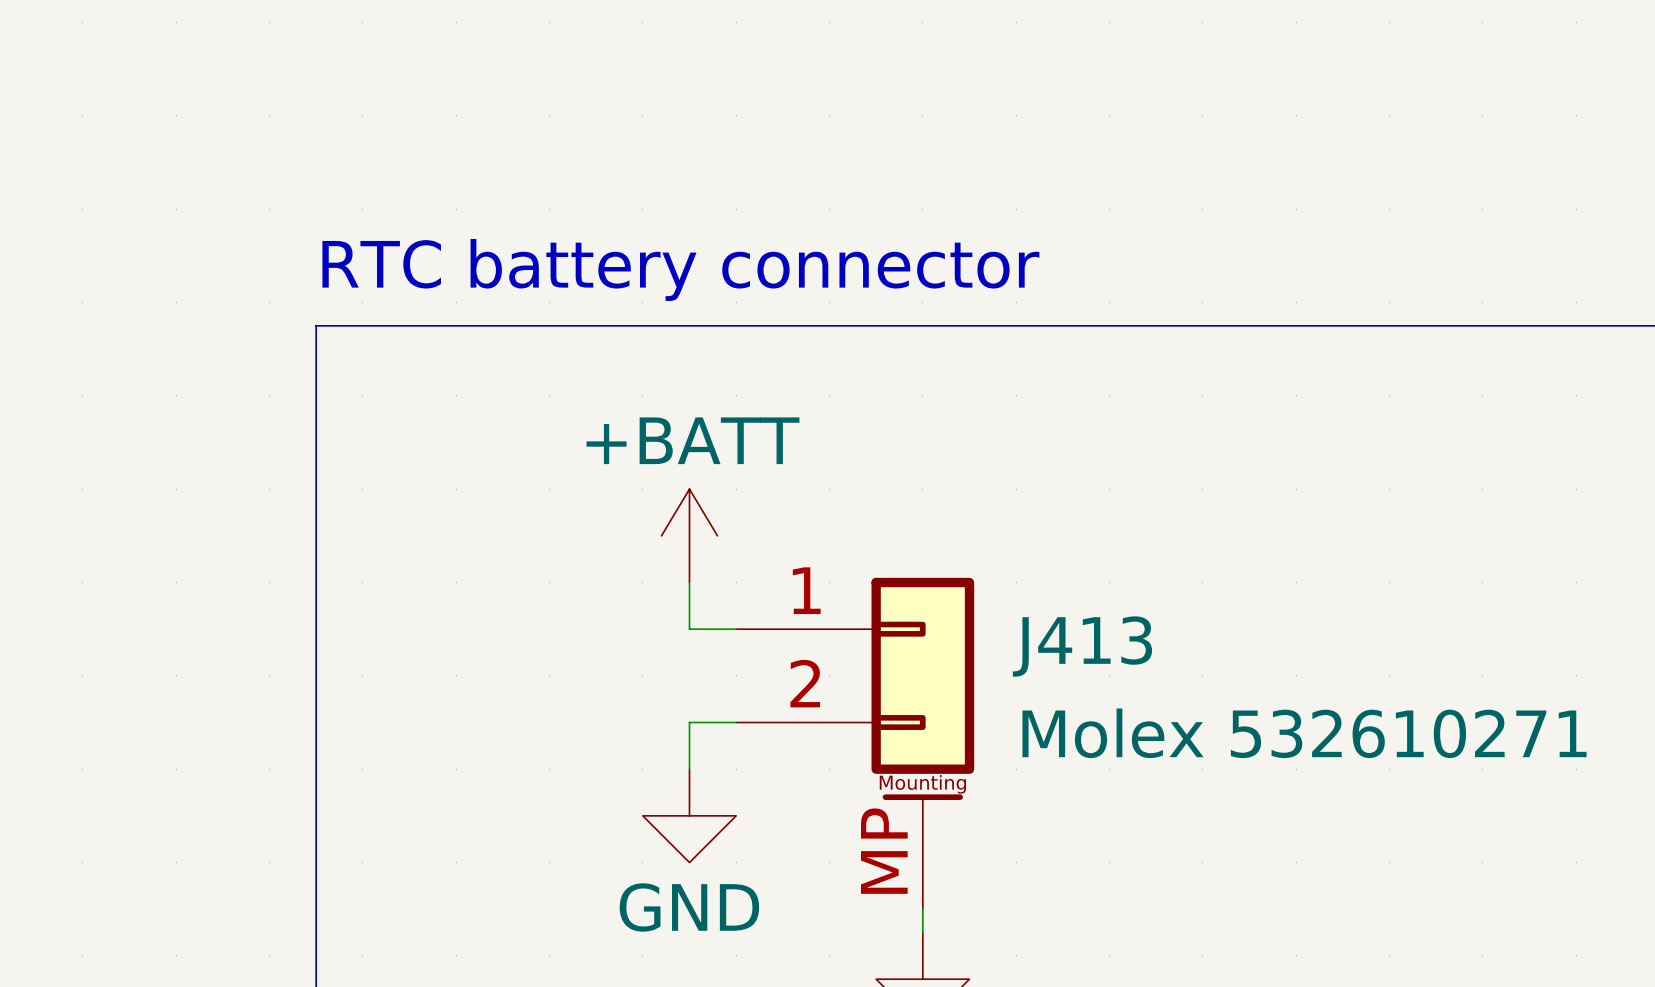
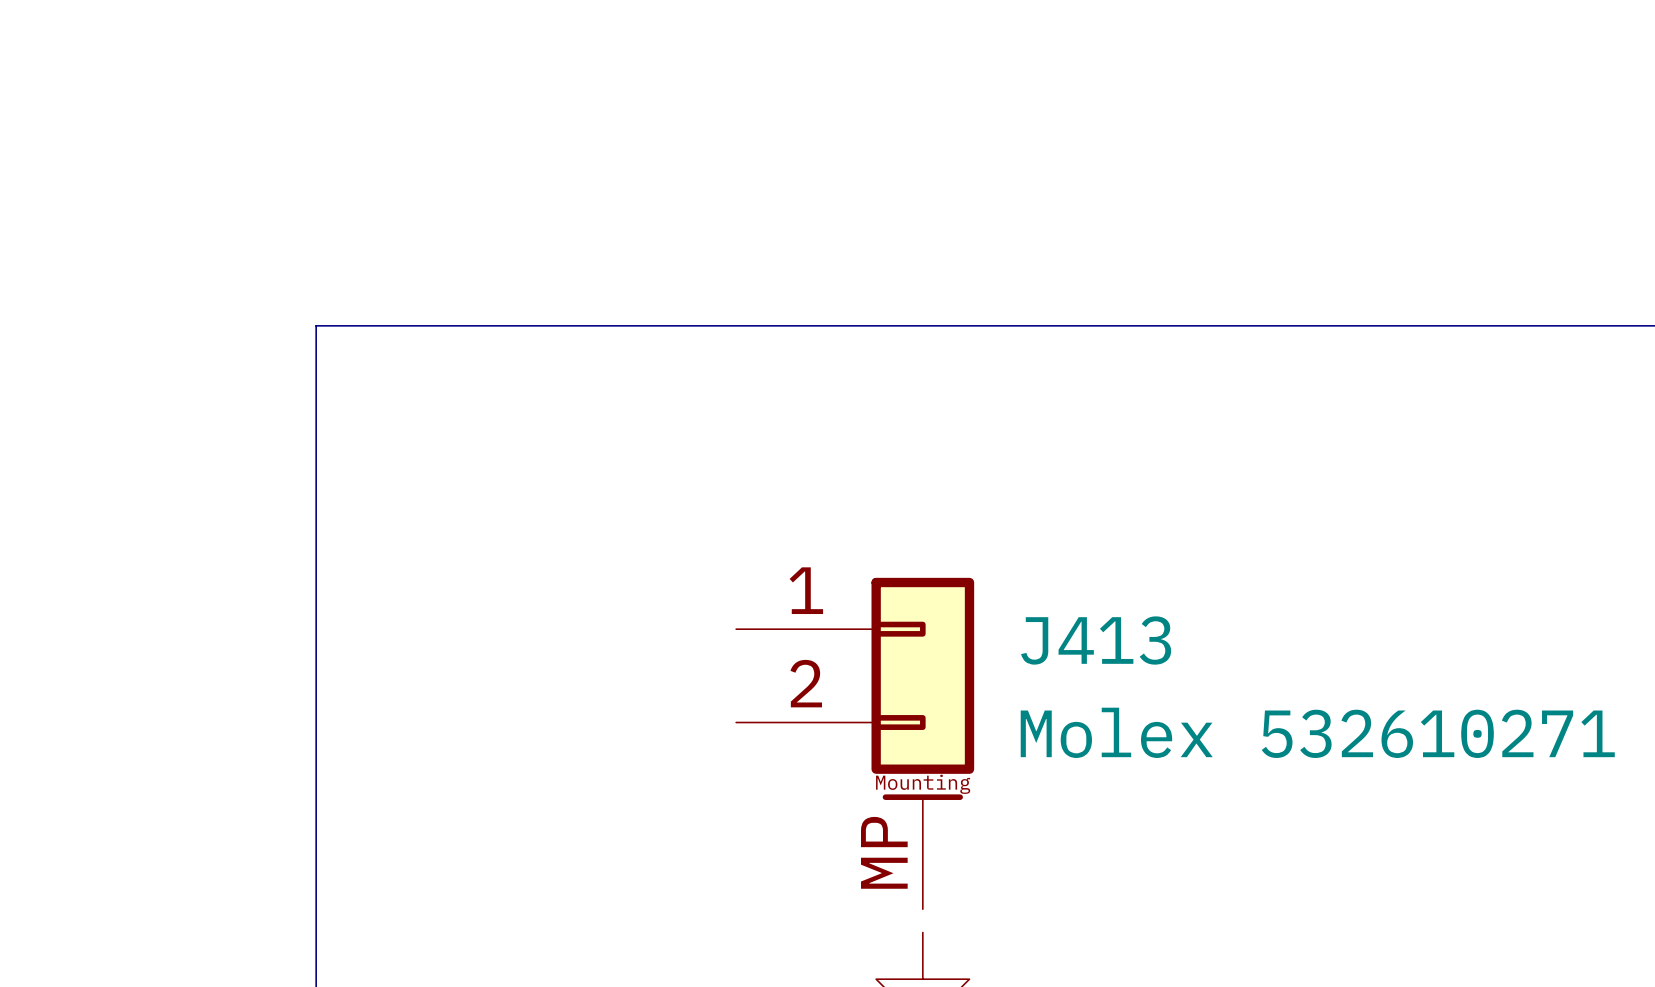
text: RTC battery connector (680, 269) -> none
power symbol: +BATT (689, 535) -> none
wire: (689, 582) (689, 629) (736, 629) -> none
wire: (736, 722) (689, 722) (689, 769) -> none
power symbol: GND (689, 815) -> none
wire: (922, 909) (922, 932) -> none

